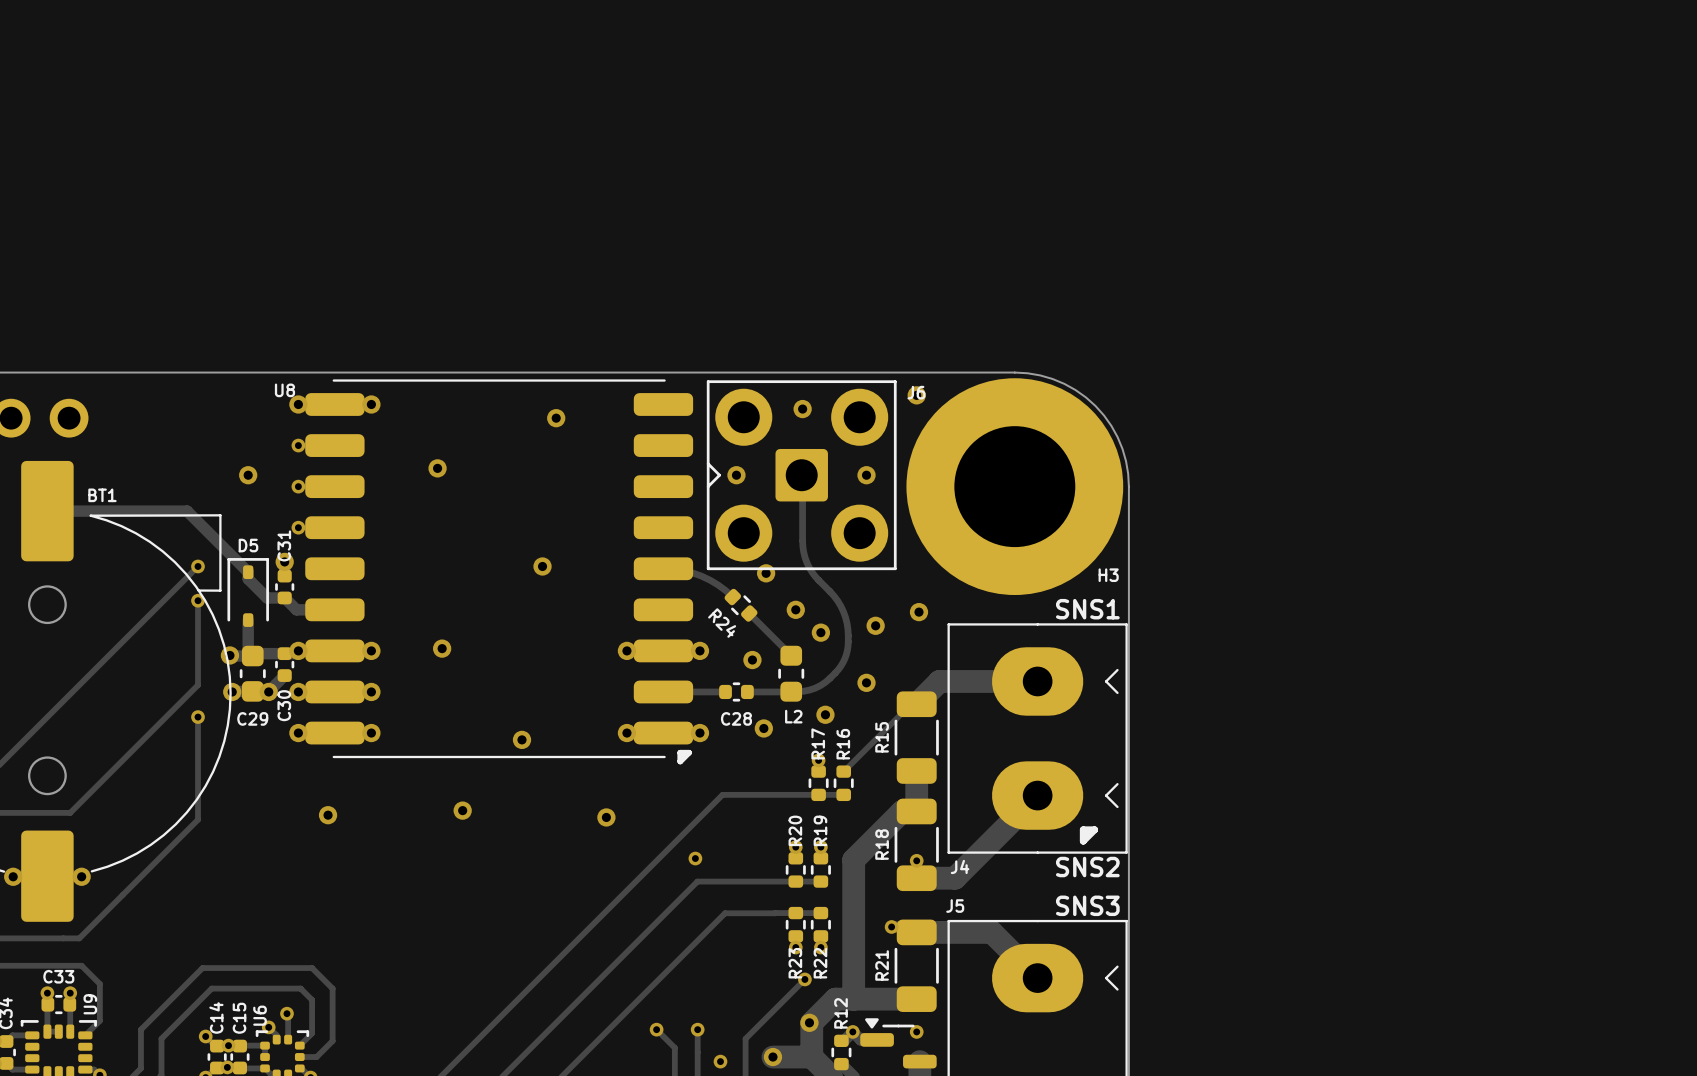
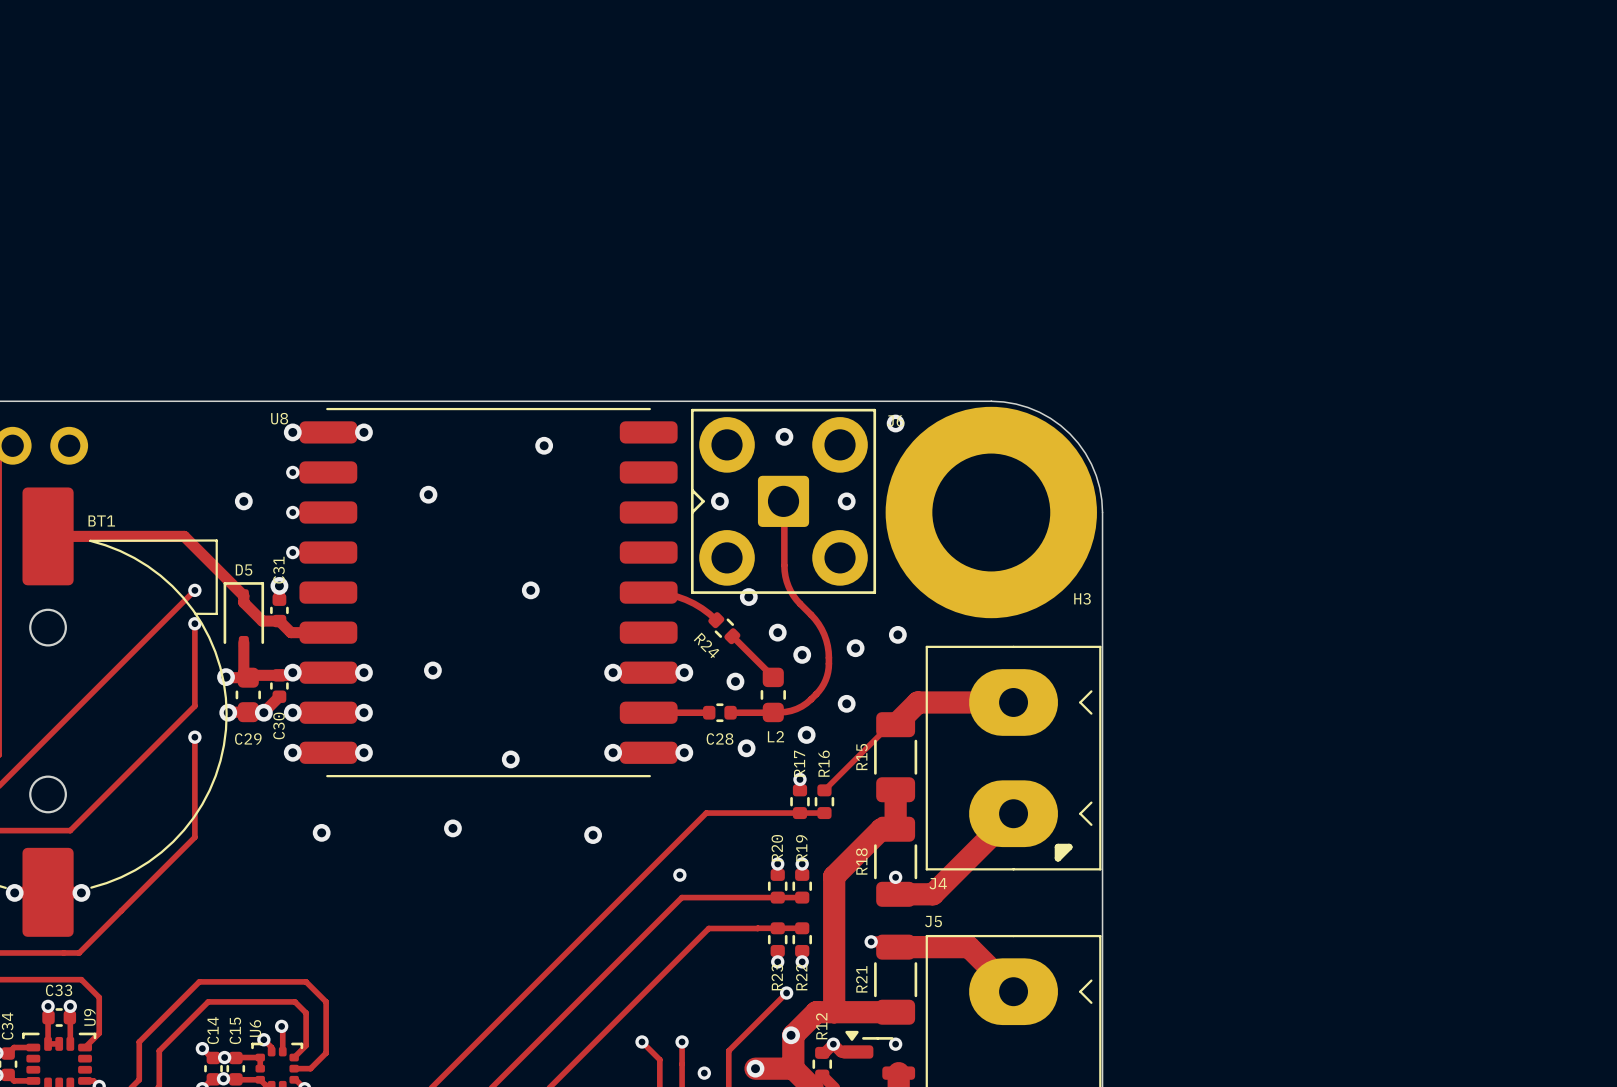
U8 footprint: [305, 379, 694, 765] -> [299, 407, 678, 778]
text: SNS1 (1087, 609) -> none
text: SNS2 (1087, 867) -> none
text: SNS3 (1087, 905) -> none

